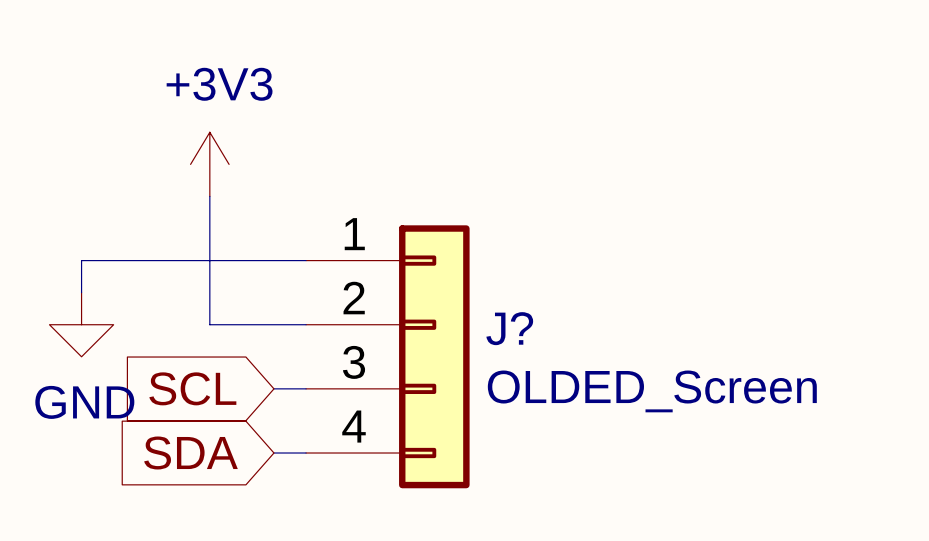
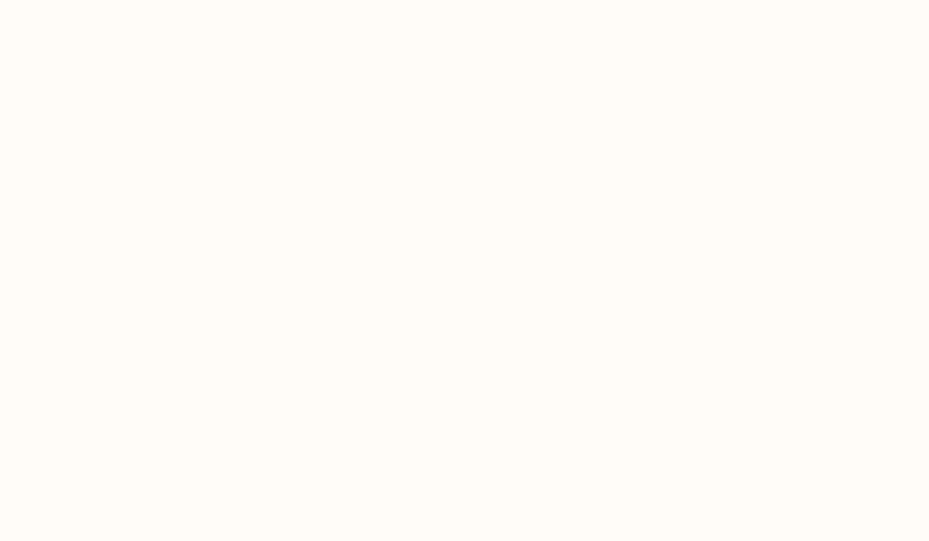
power symbol: +3V3 (209, 164) -> none
wire: (209, 196) (209, 324) (306, 324) -> none
wire: (306, 260) (81, 260) (81, 292) -> none
power symbol: GND (81, 324) -> none
J?: OLDED_Screen (387, 356) -> none
global label: SCL (192, 388) -> none
wire: (273, 388) (306, 388) -> none
global label: SDA (190, 452) -> none
wire: (273, 453) (306, 453) -> none

